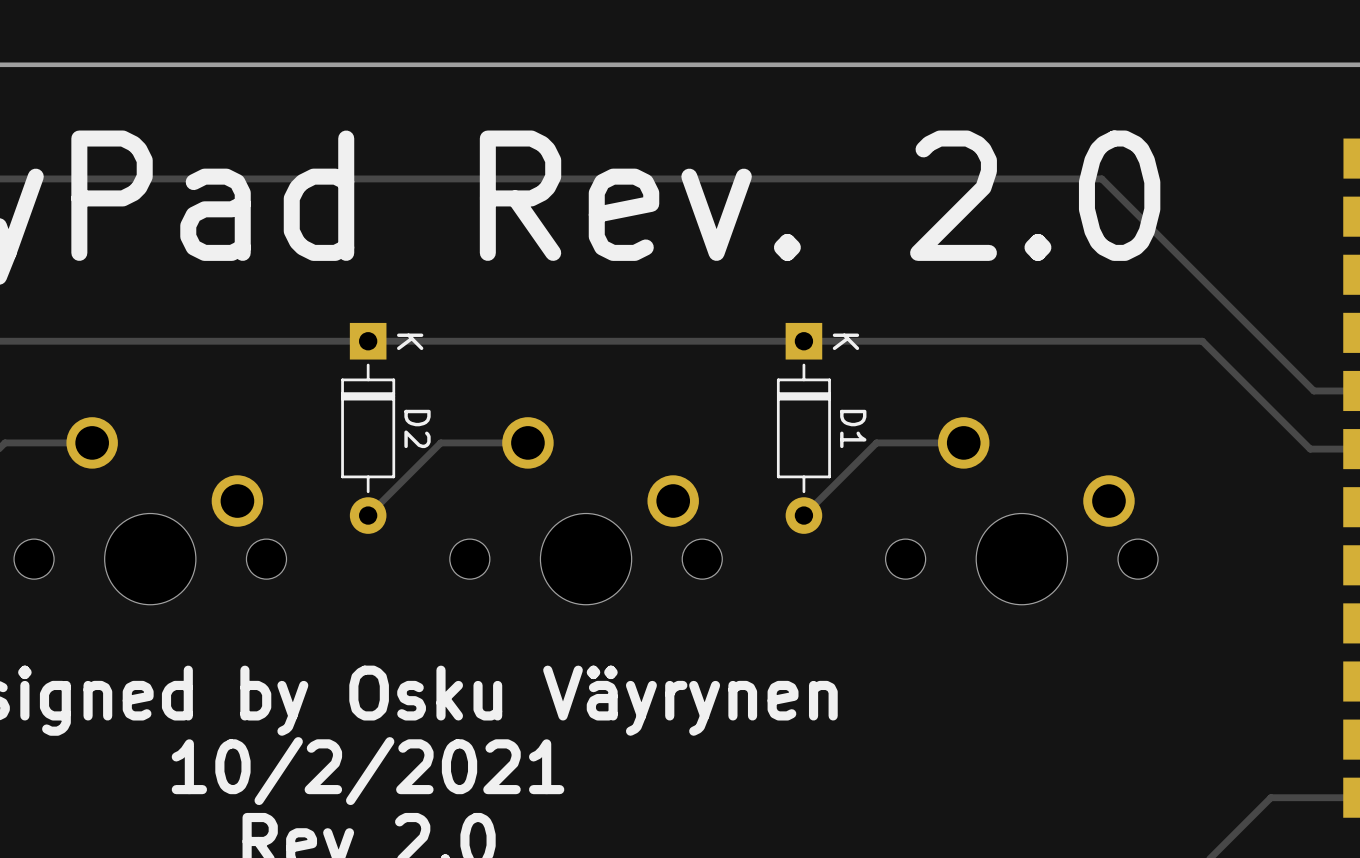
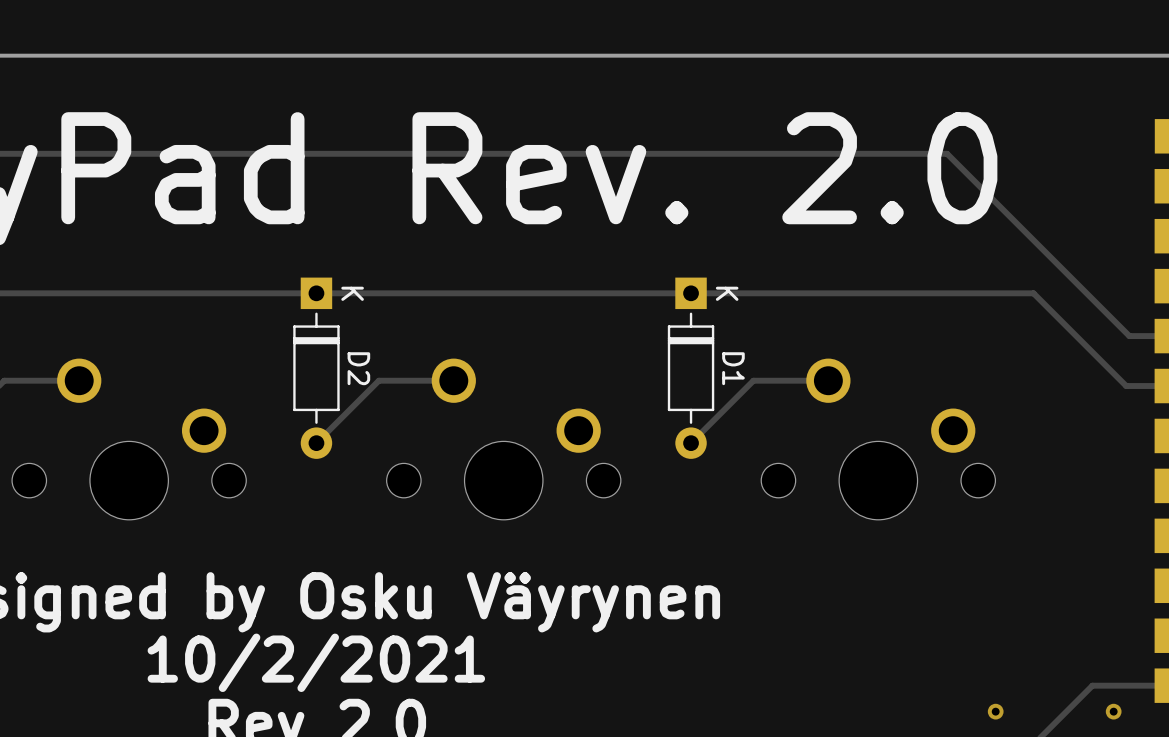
via: none -> (995, 711)
via: none -> (1113, 711)

